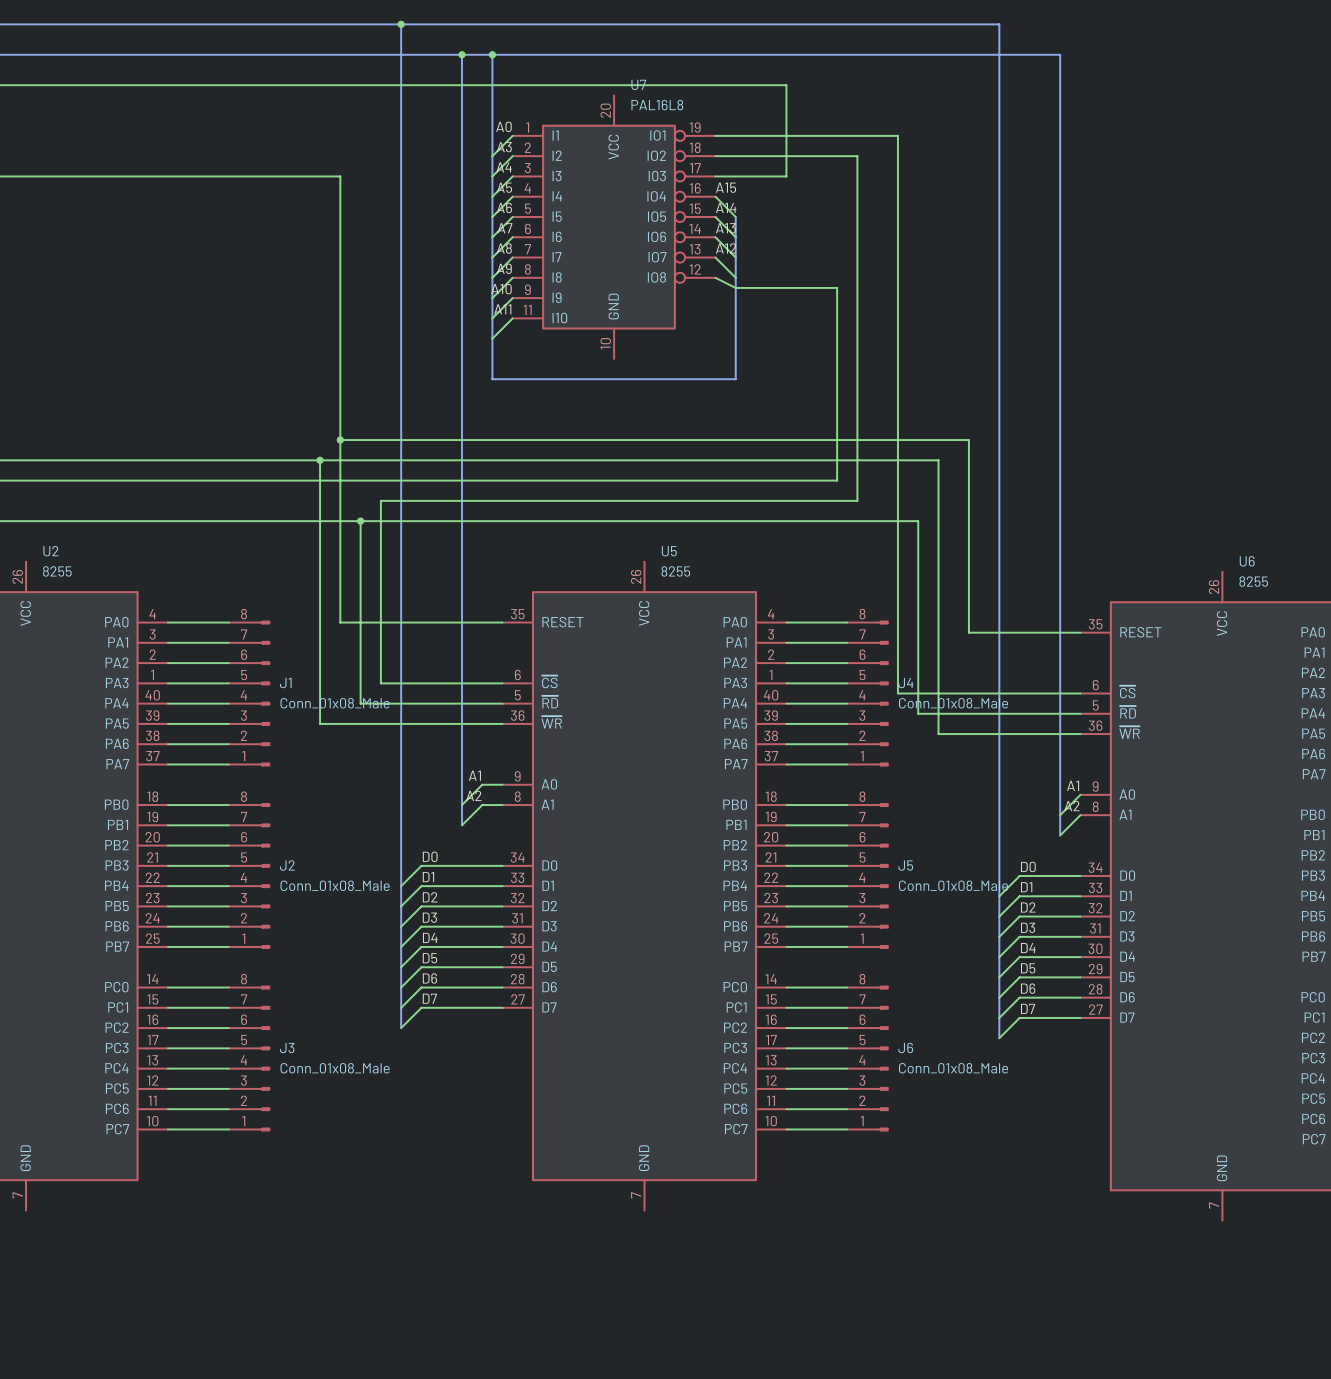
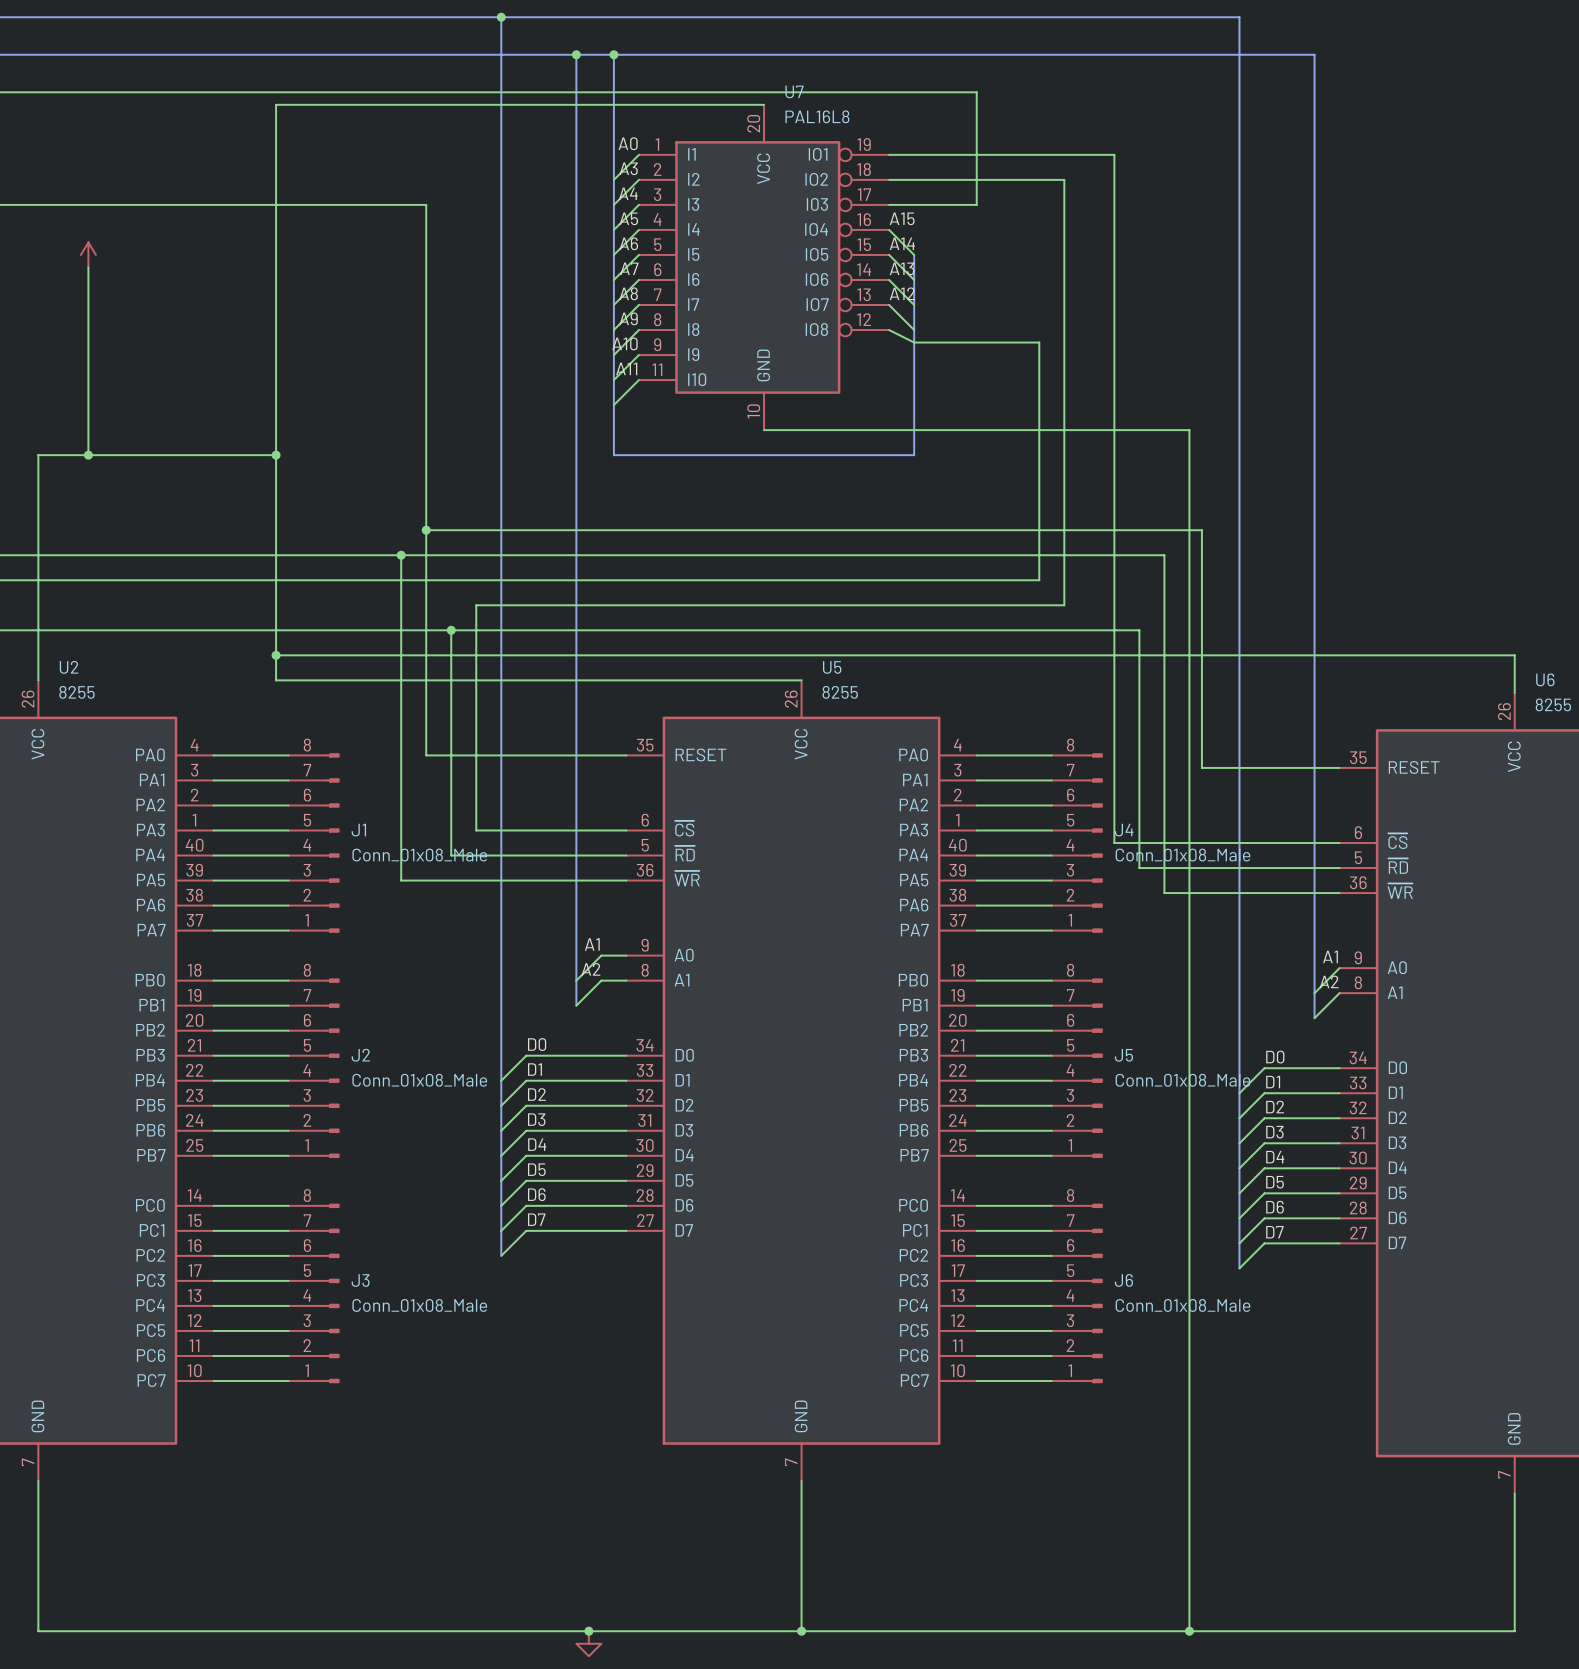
wire: none -> (764, 104) (276, 104) (276, 680) (801, 680)
power symbol: none -> (88, 254)
wire: none -> (88, 267) (88, 455)
wire: none -> (764, 430) (1189, 430) (1189, 1631)
junction: none -> (88, 455)
wire: none -> (276, 455) (38, 455) (38, 680)
junction: none -> (276, 455)
wire: none -> (276, 655) (1514, 655) (1514, 692)
junction: none -> (276, 655)
wire: none -> (38, 1481) (38, 1631) (1514, 1631) (1514, 1493)
wire: none -> (801, 1481) (801, 1631)
junction: none -> (588, 1631)
junction: none -> (801, 1631)
junction: none -> (1189, 1631)
power symbol: none -> (588, 1643)

